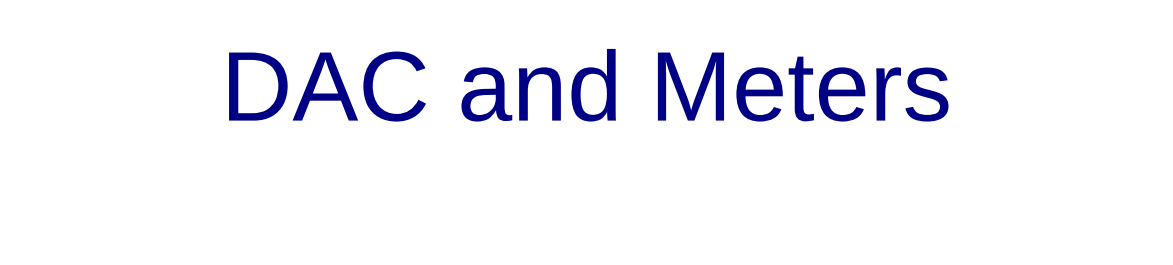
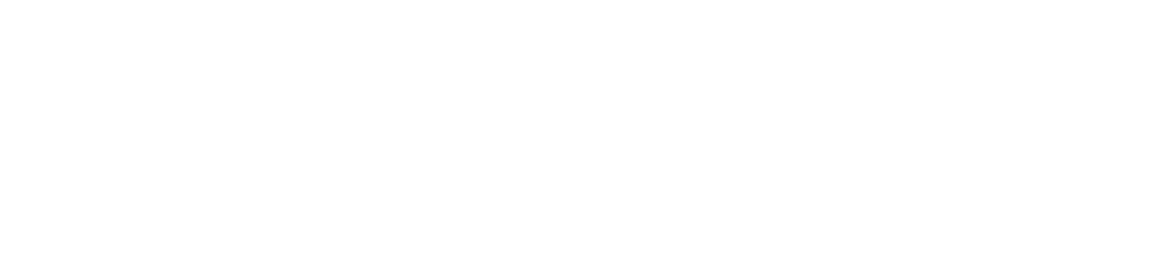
text: DAC and Meters (588, 85) -> none

